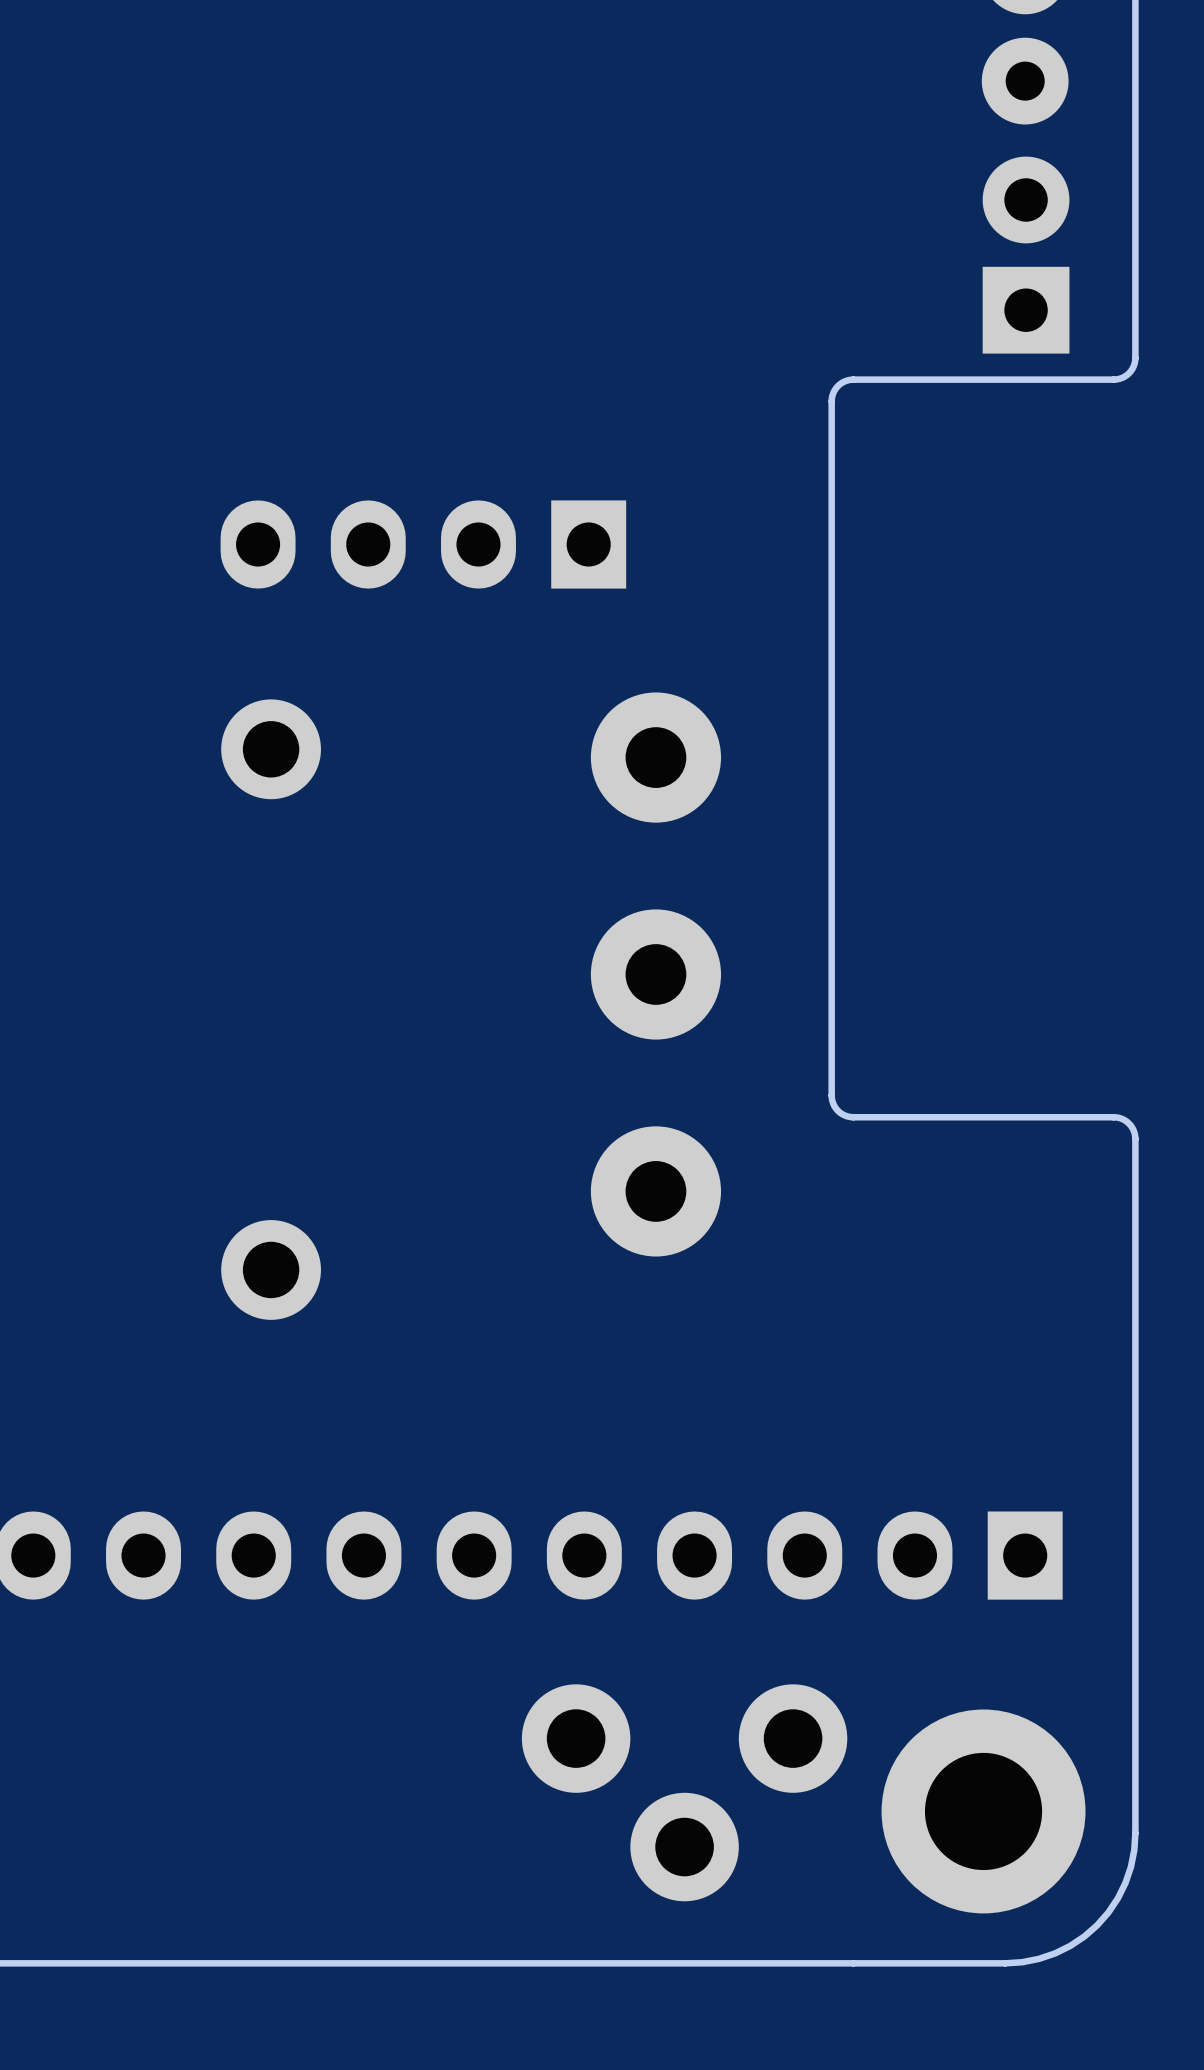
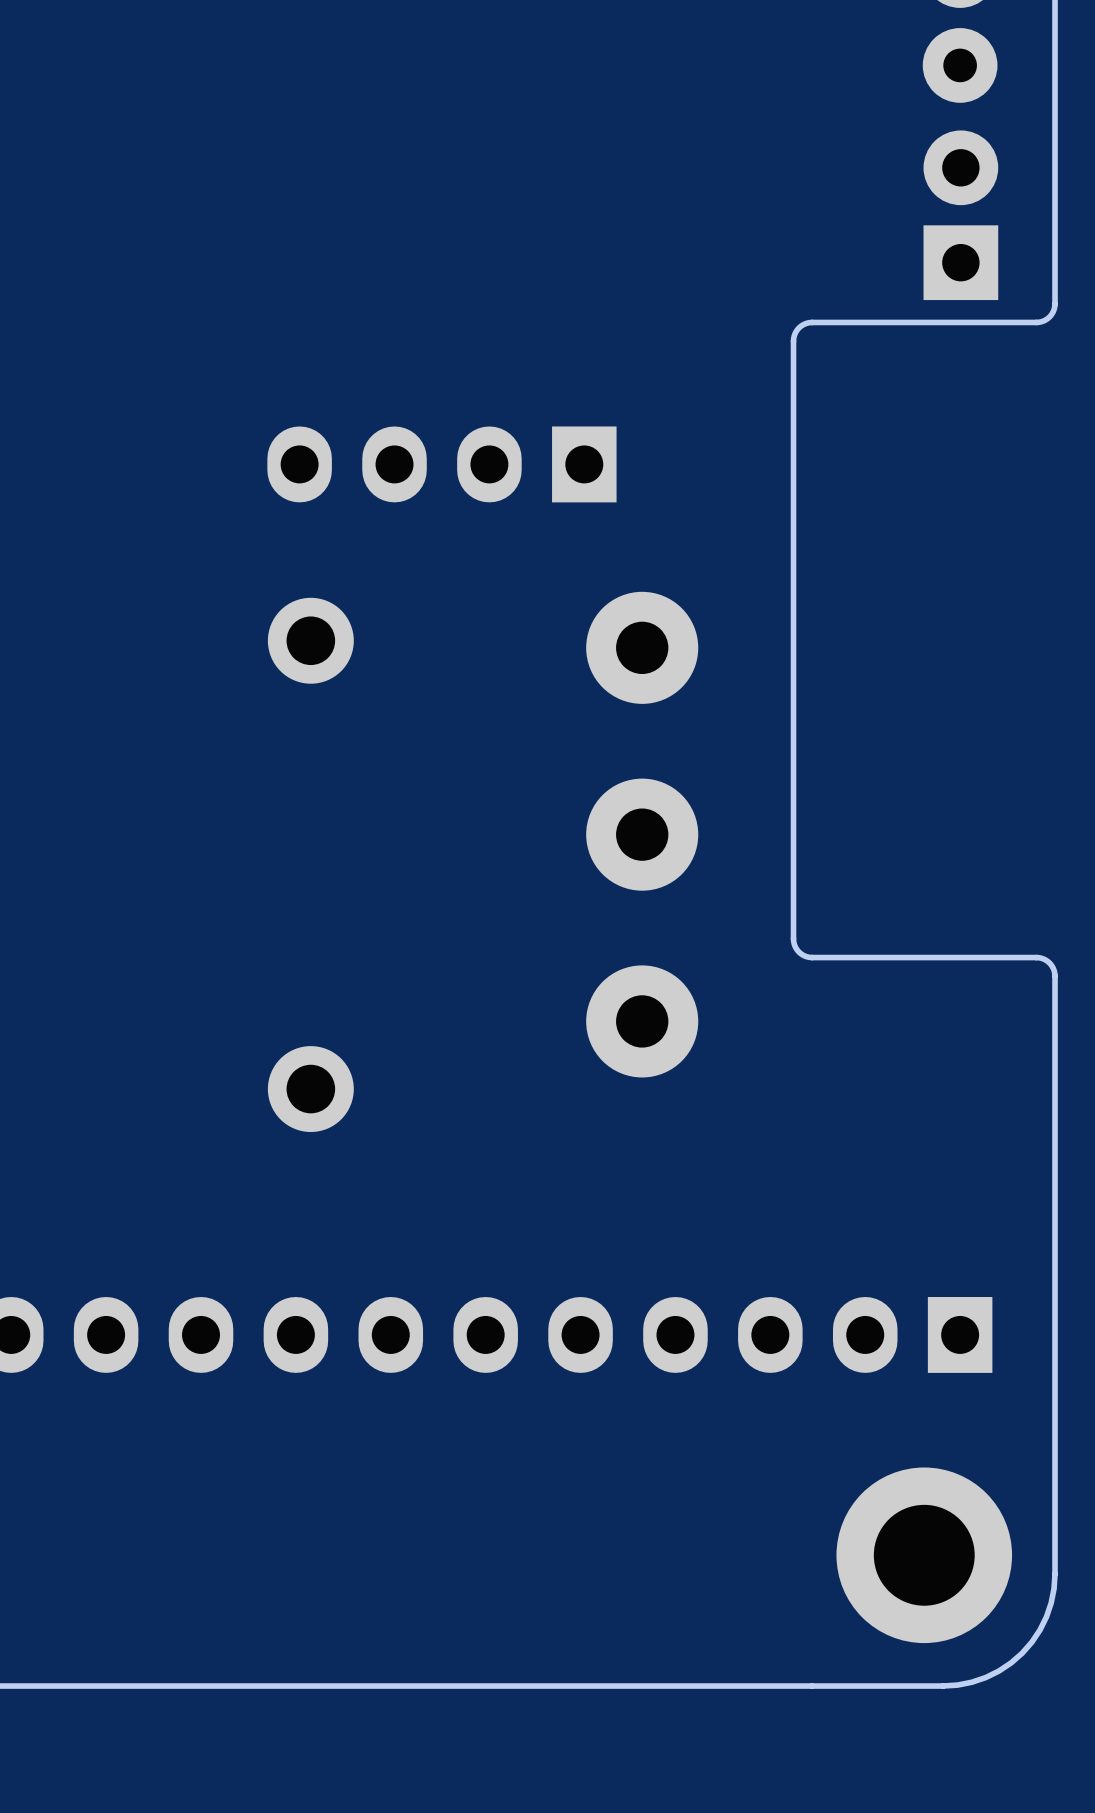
part: (684, 1792) -> none

